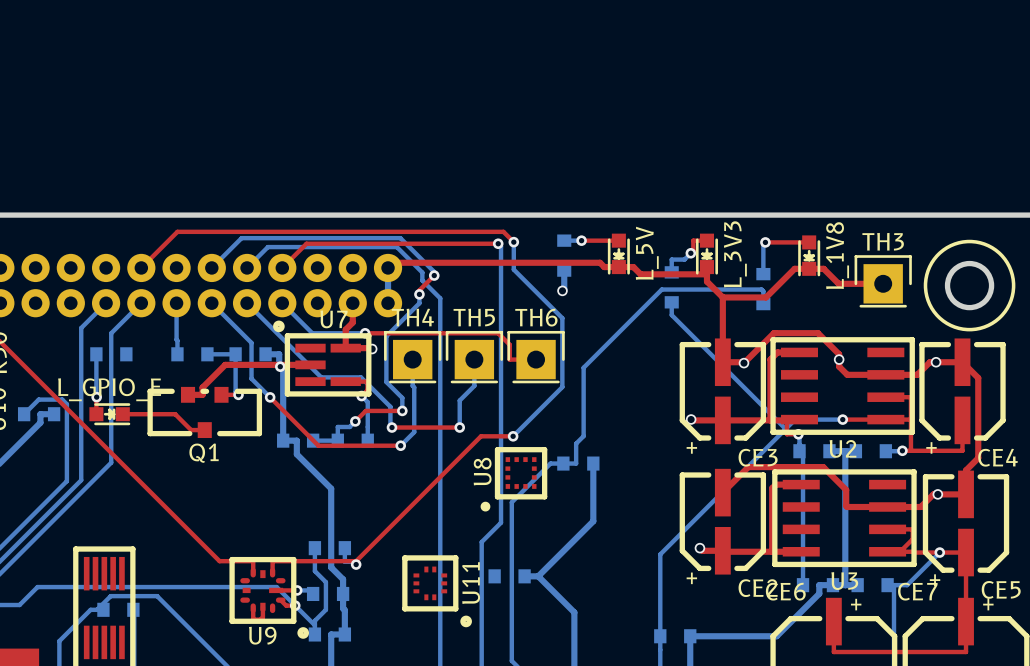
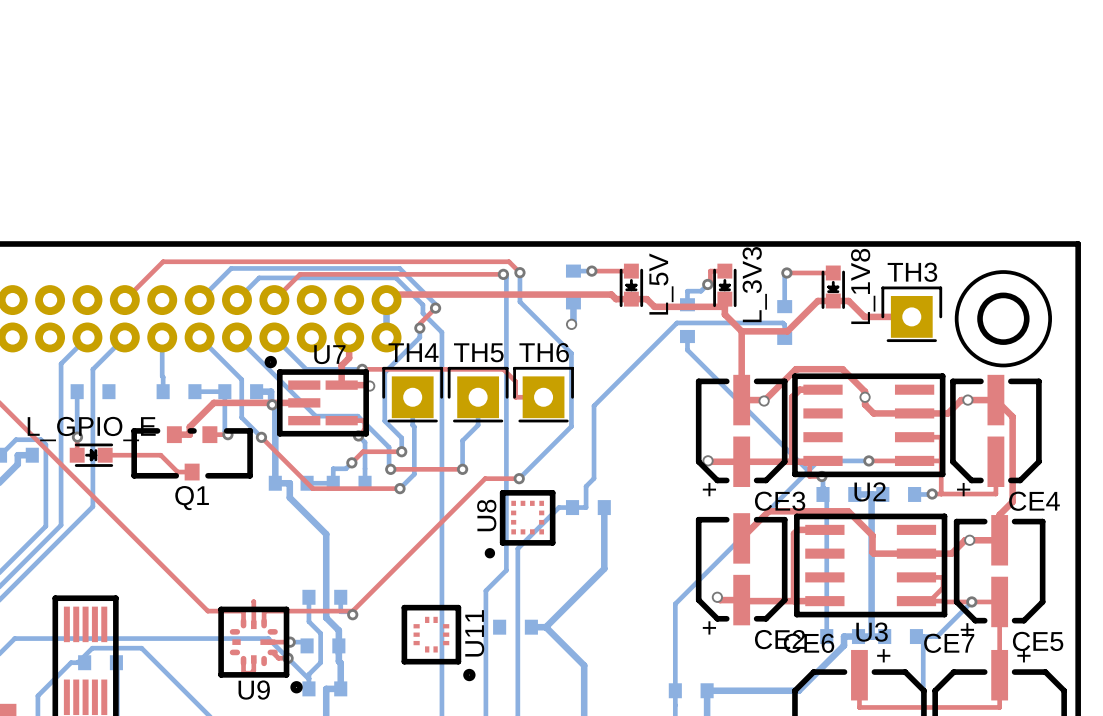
top track: none -> (253, 601) (253, 624)

